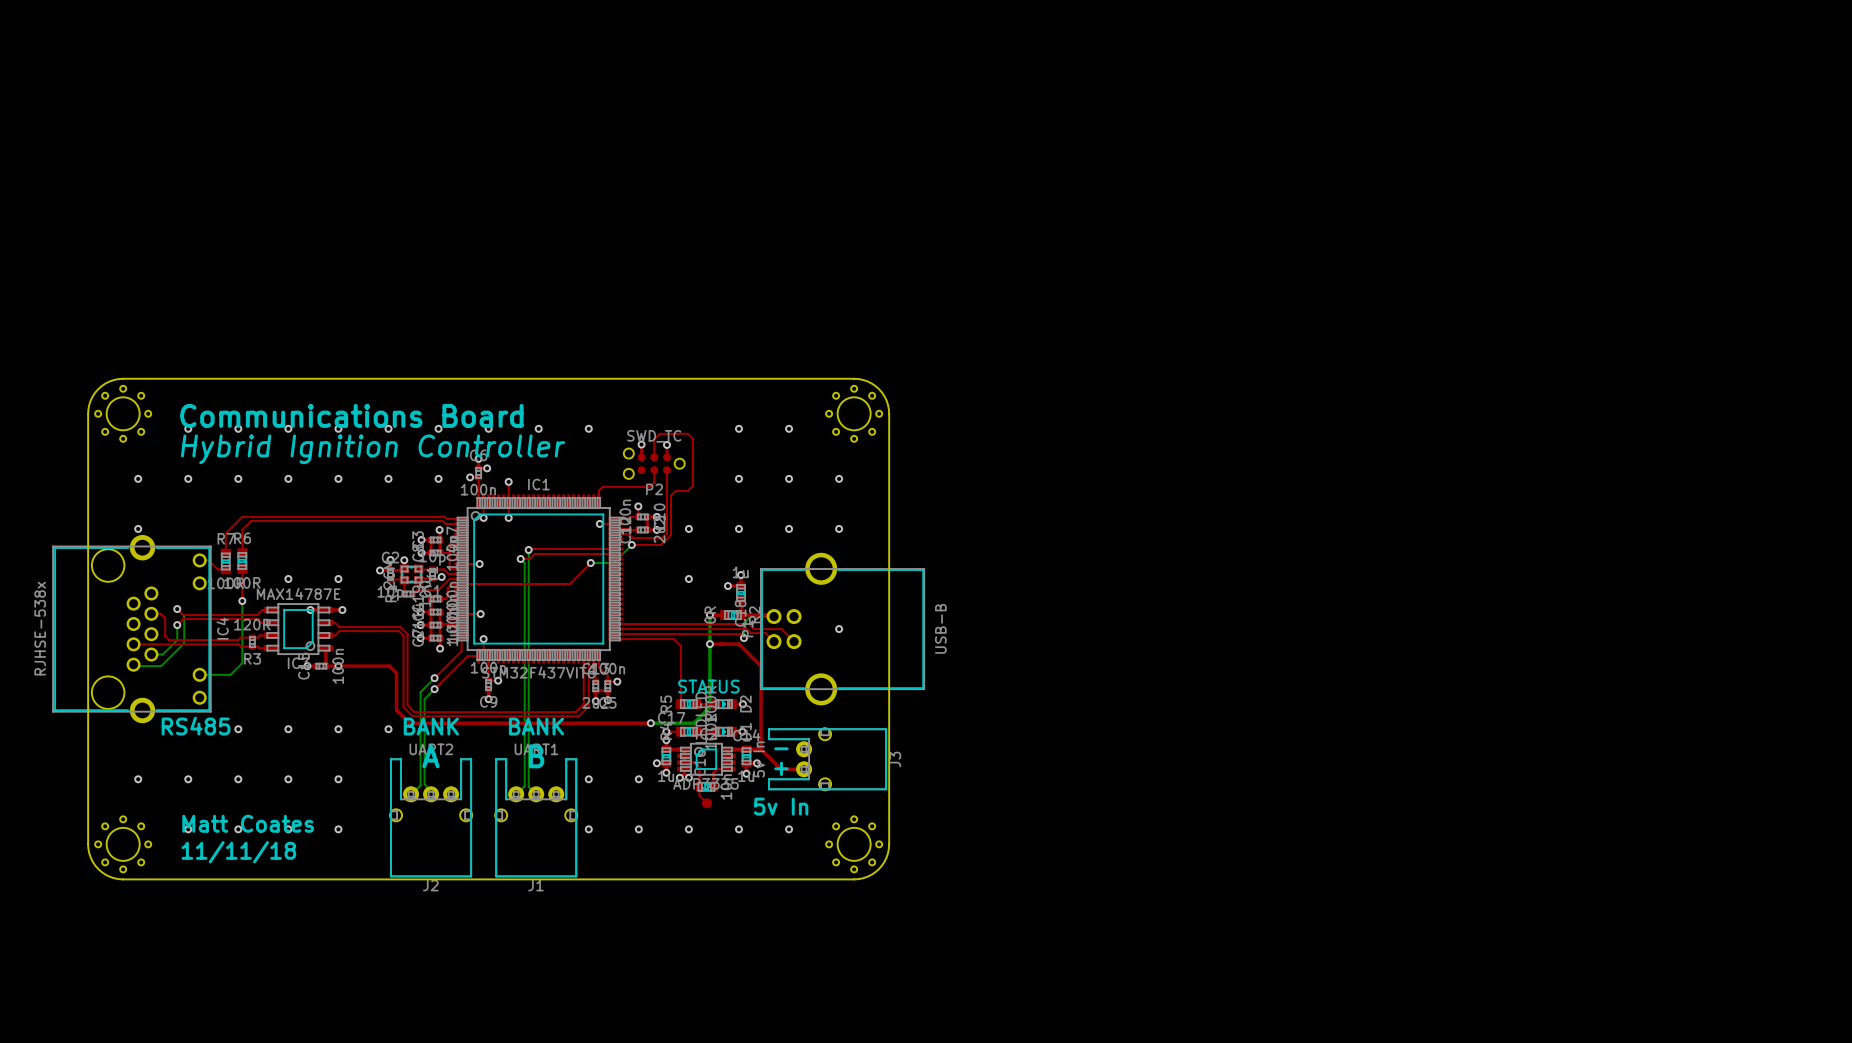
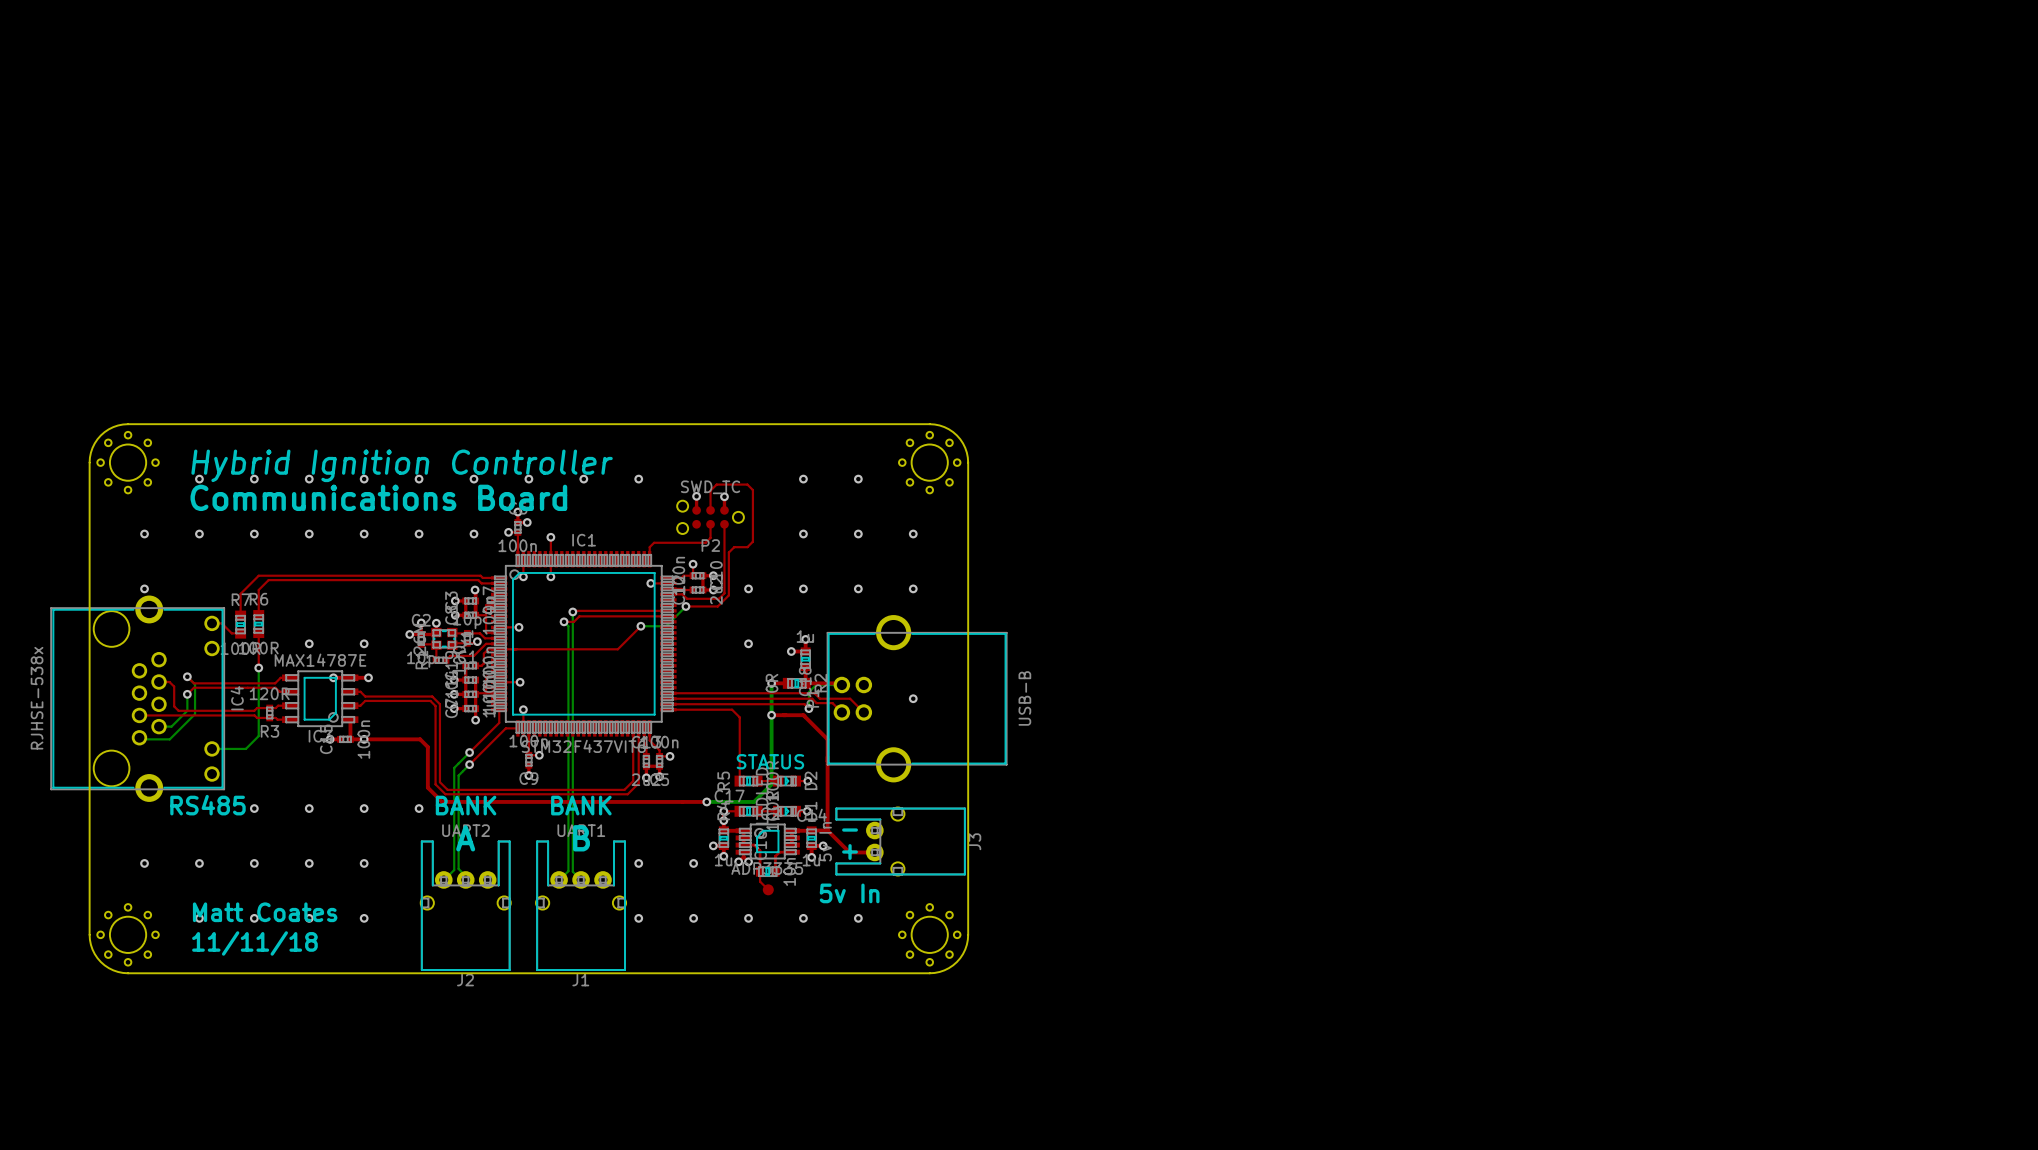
text: Communications Board (351, 415) -> Hybrid Ignition Controller (402, 465)
text: Hybrid Ignition Controller (373, 449) -> Communications Board (378, 497)

